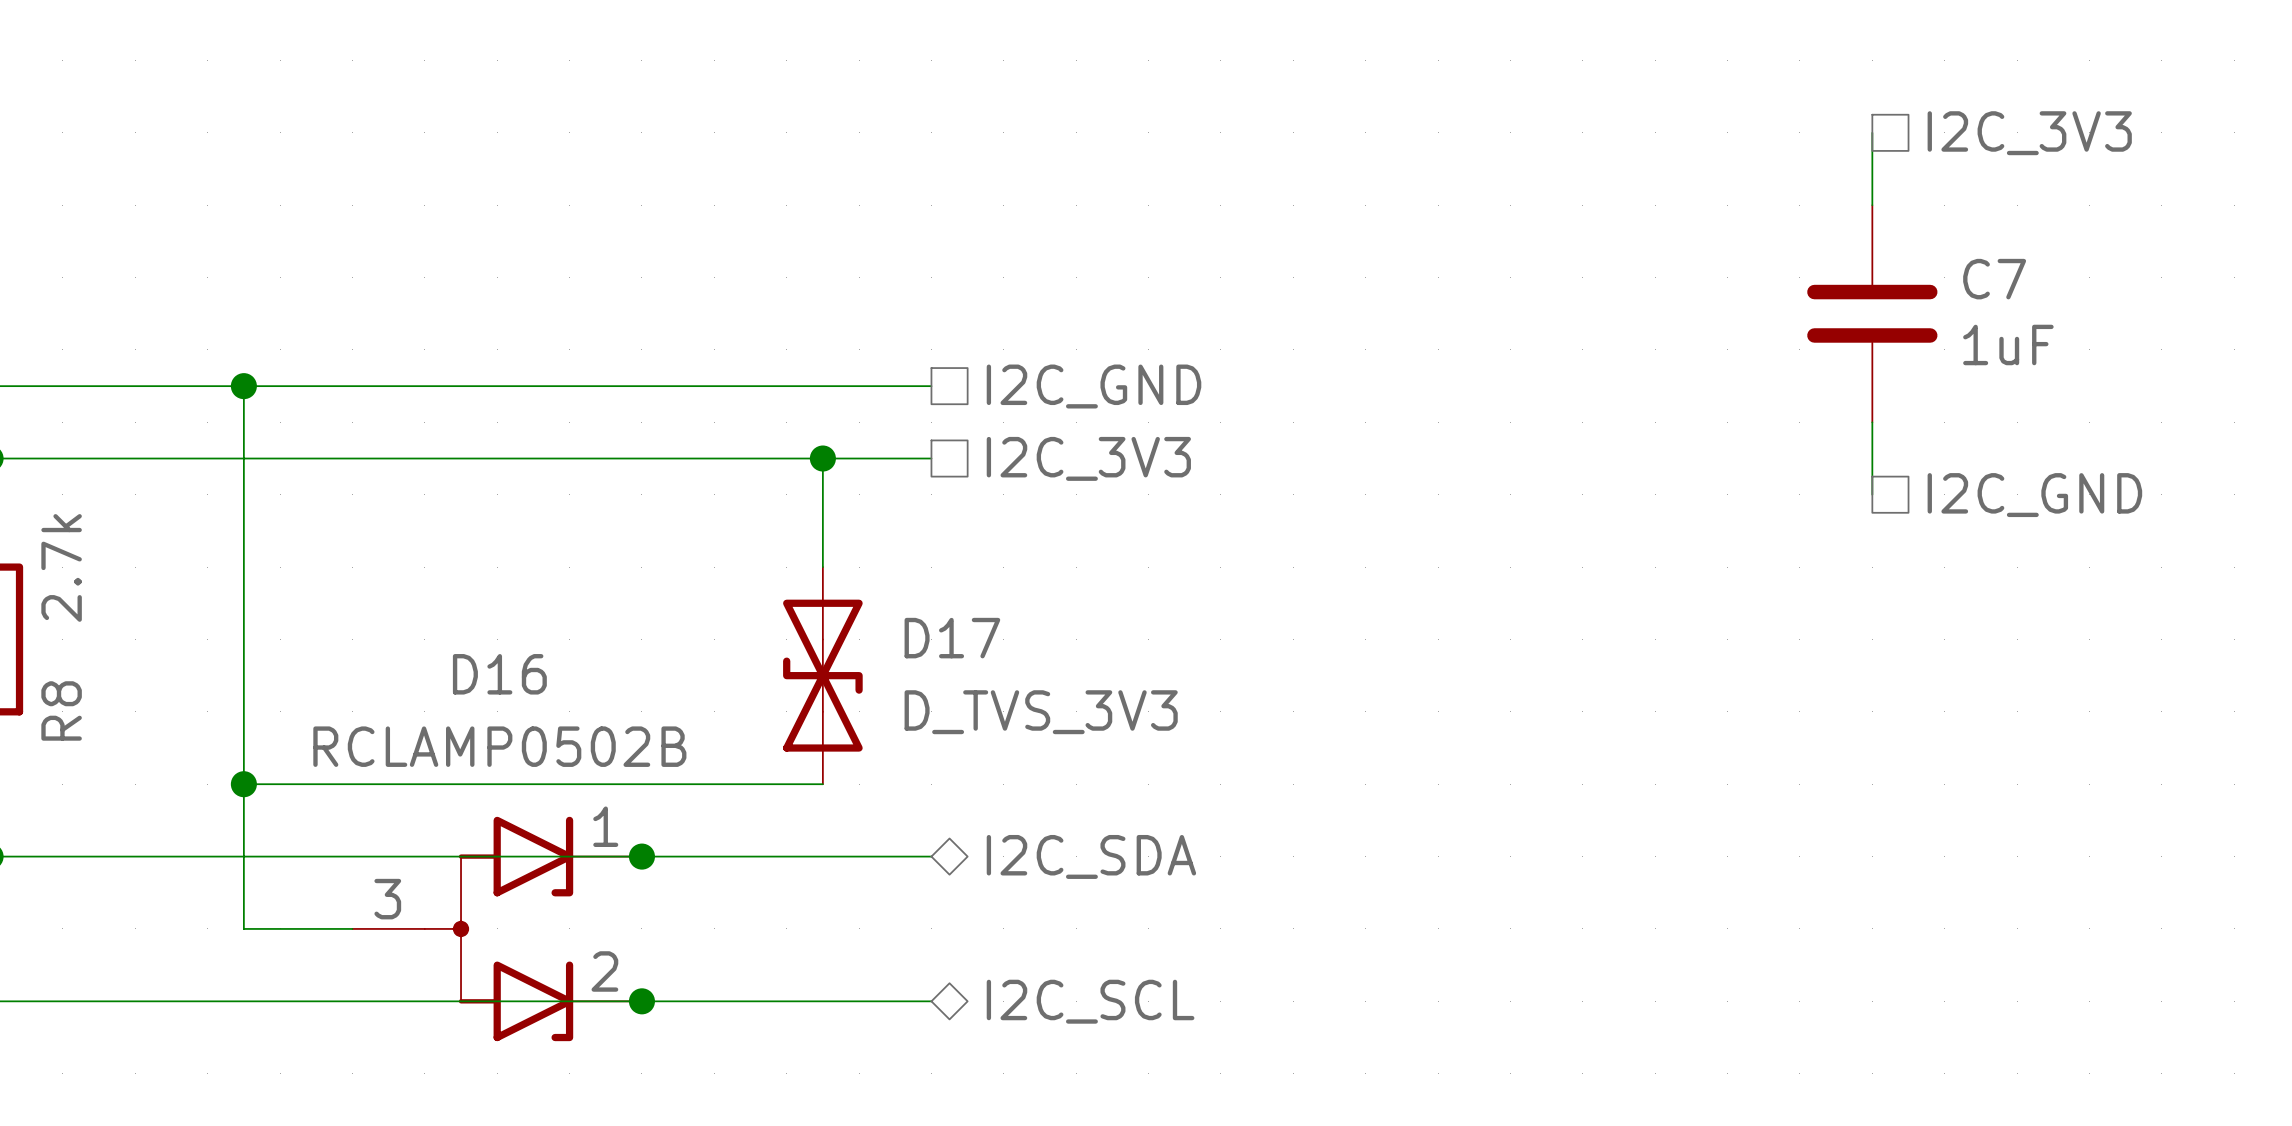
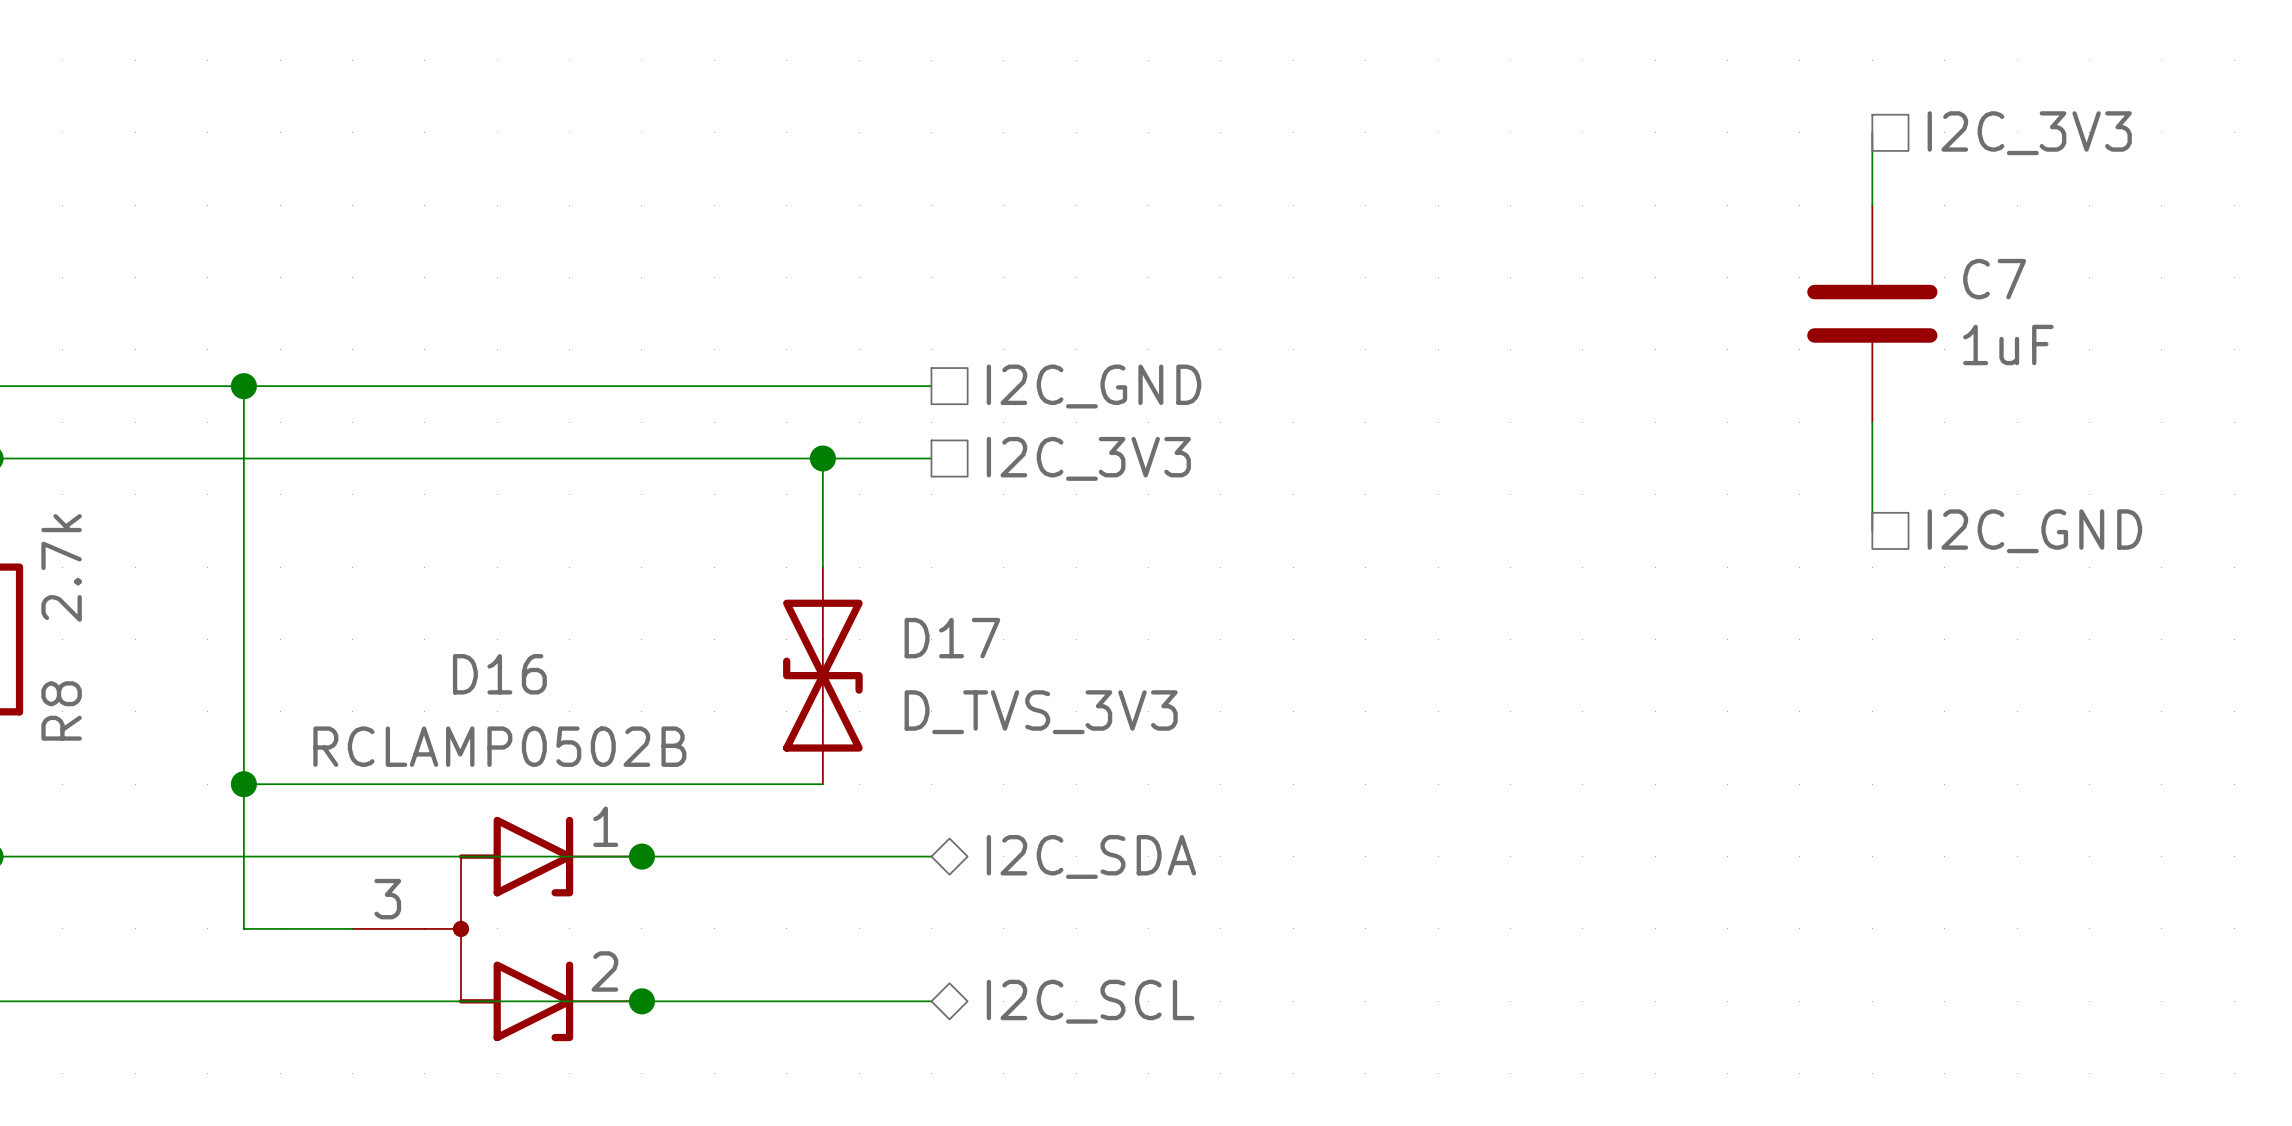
hierarchical label position: I2C_GND (2034, 495) -> I2C_GND (2034, 531)

